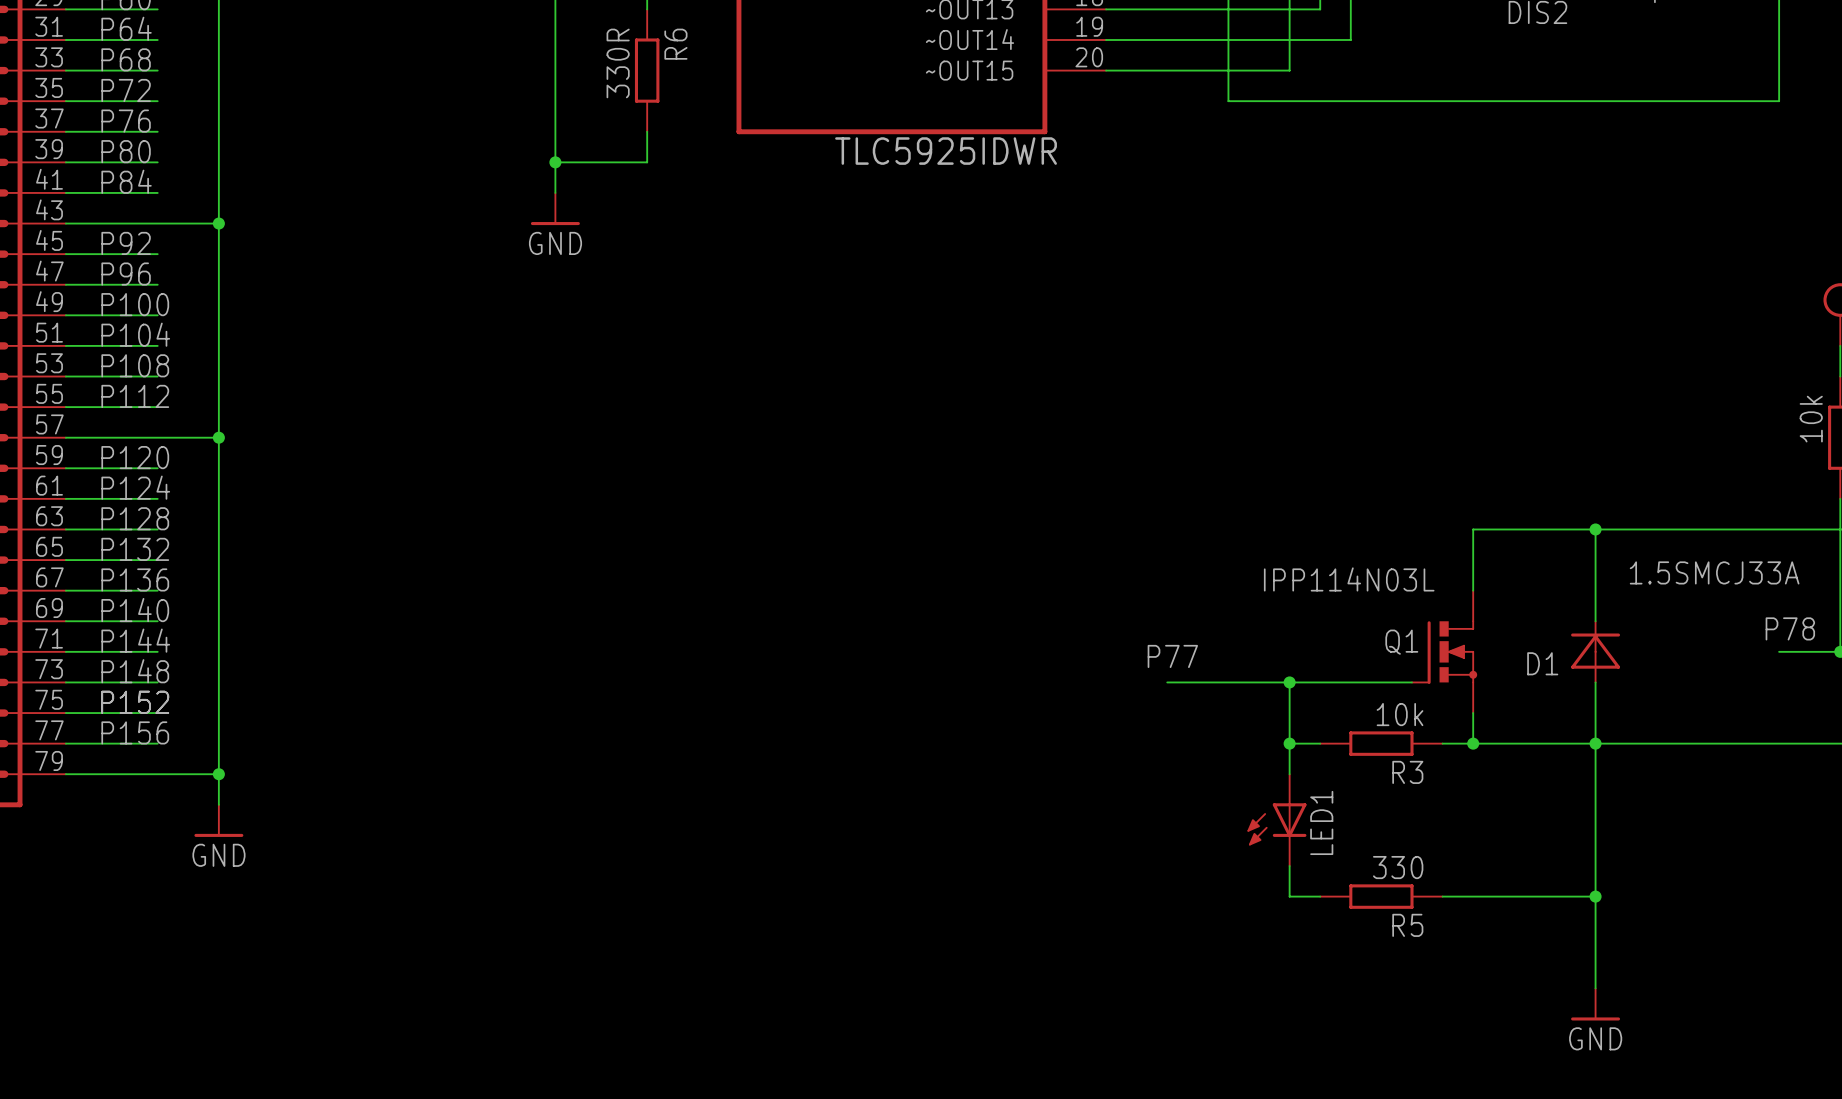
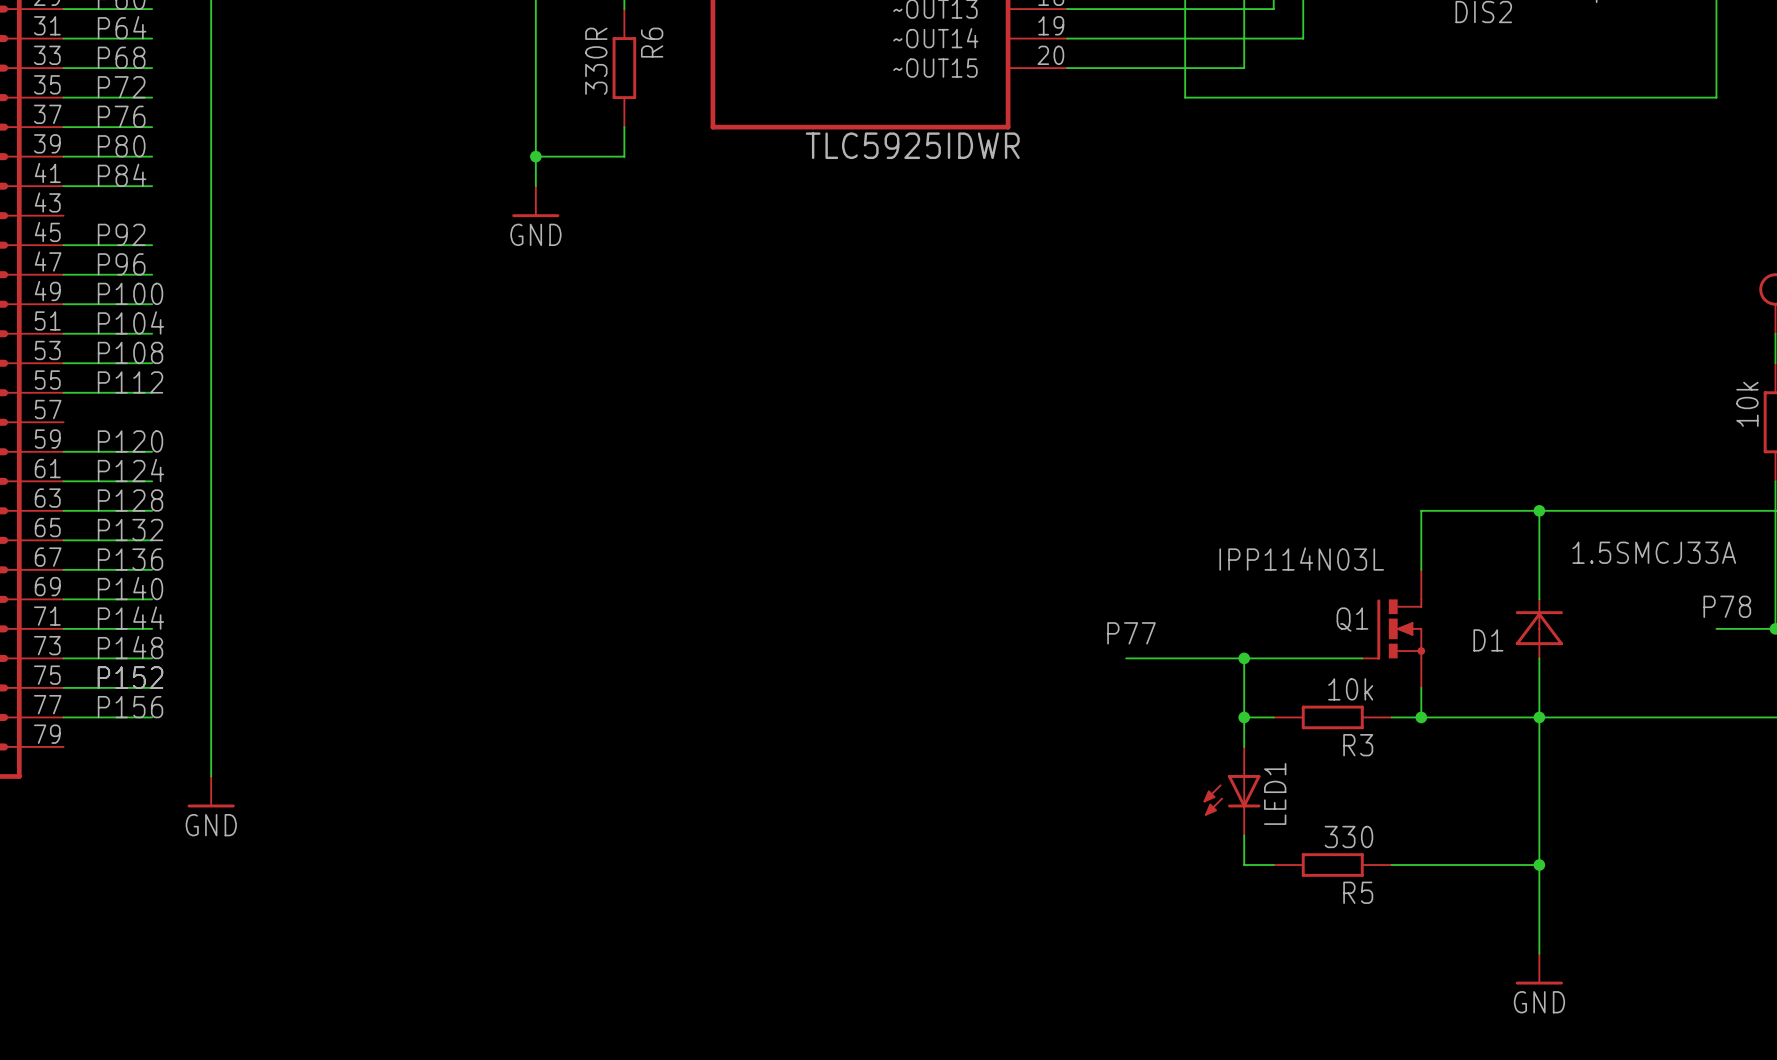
wire: (65, 223) (218, 223) -> none
junction: (218, 223) -> none
wire: (65, 437) (218, 437) -> none
junction: (218, 437) -> none
wire: (65, 774) (218, 774) -> none
junction: (218, 774) -> none

